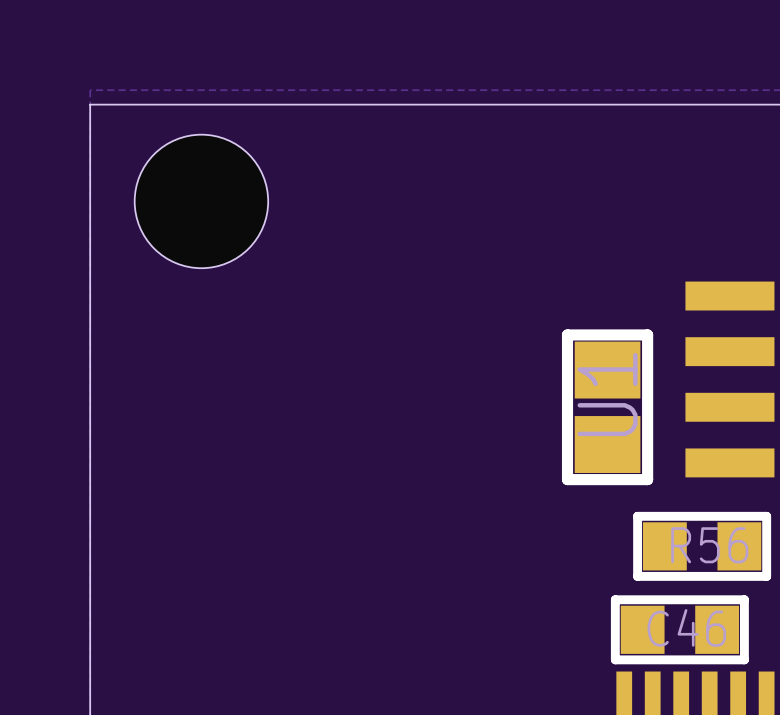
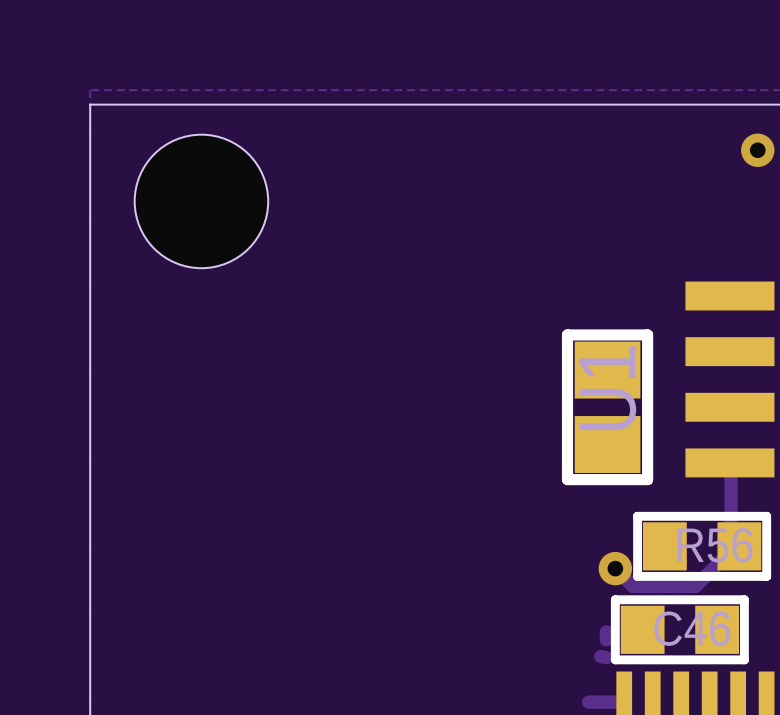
via: none -> (757, 150)
track: none -> (729, 462) (731, 541) (739, 546) (731, 550) (695, 586) (633, 586) (615, 568)
via: none -> (615, 568)
track: none -> (606, 631) (606, 639)
track: none -> (600, 656) (606, 657)
track: none -> (588, 702) (624, 702)

